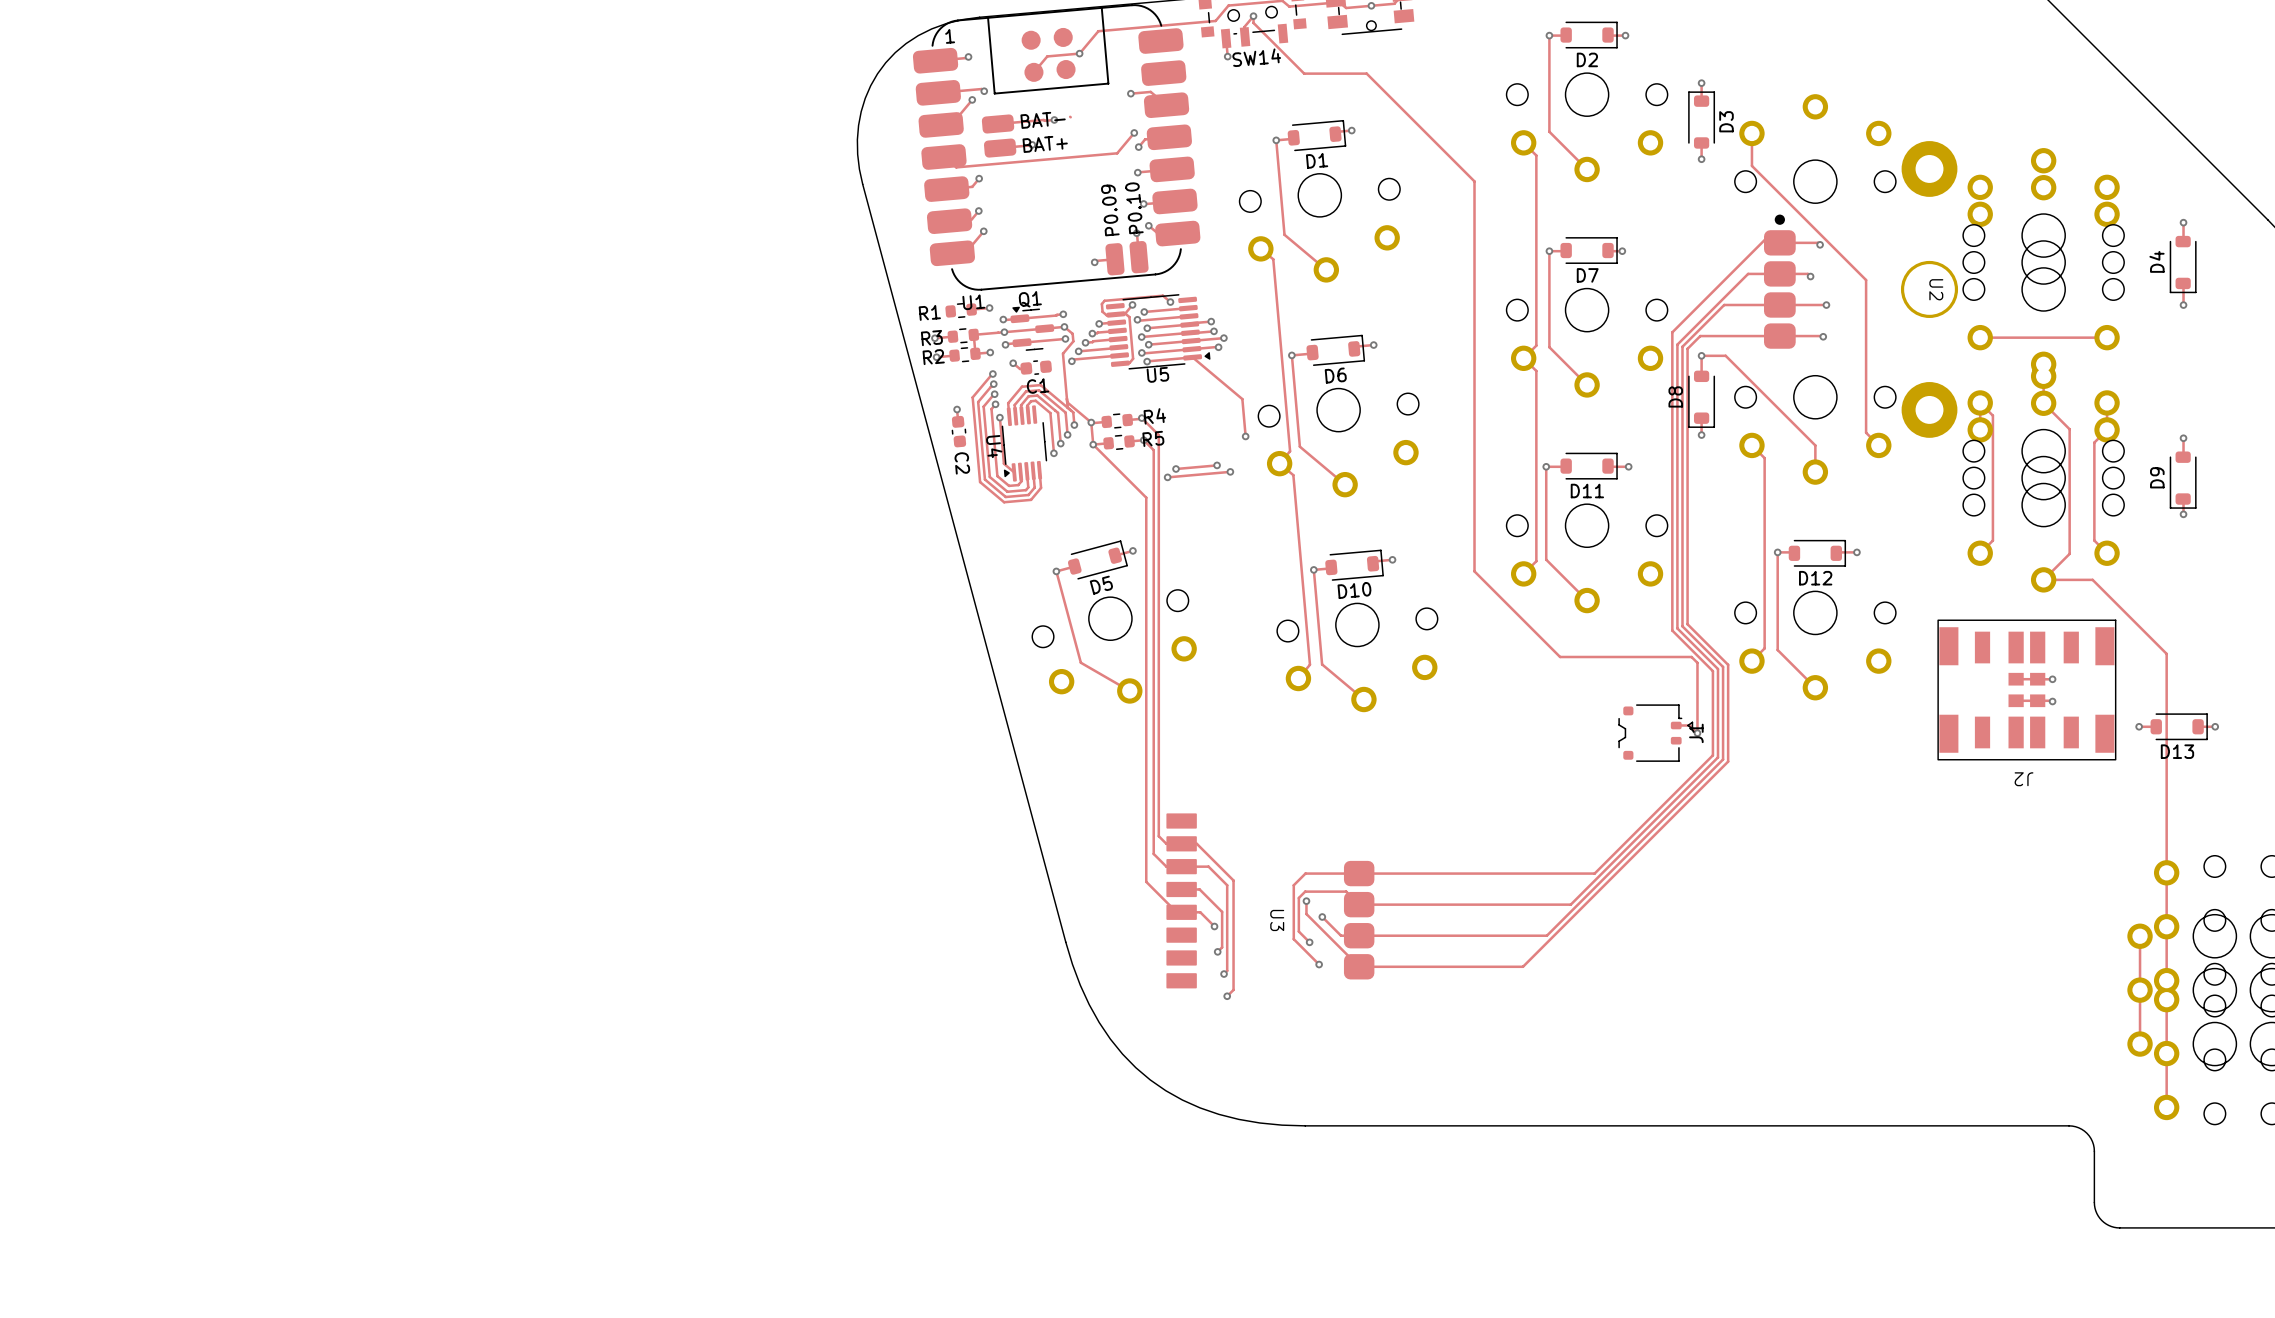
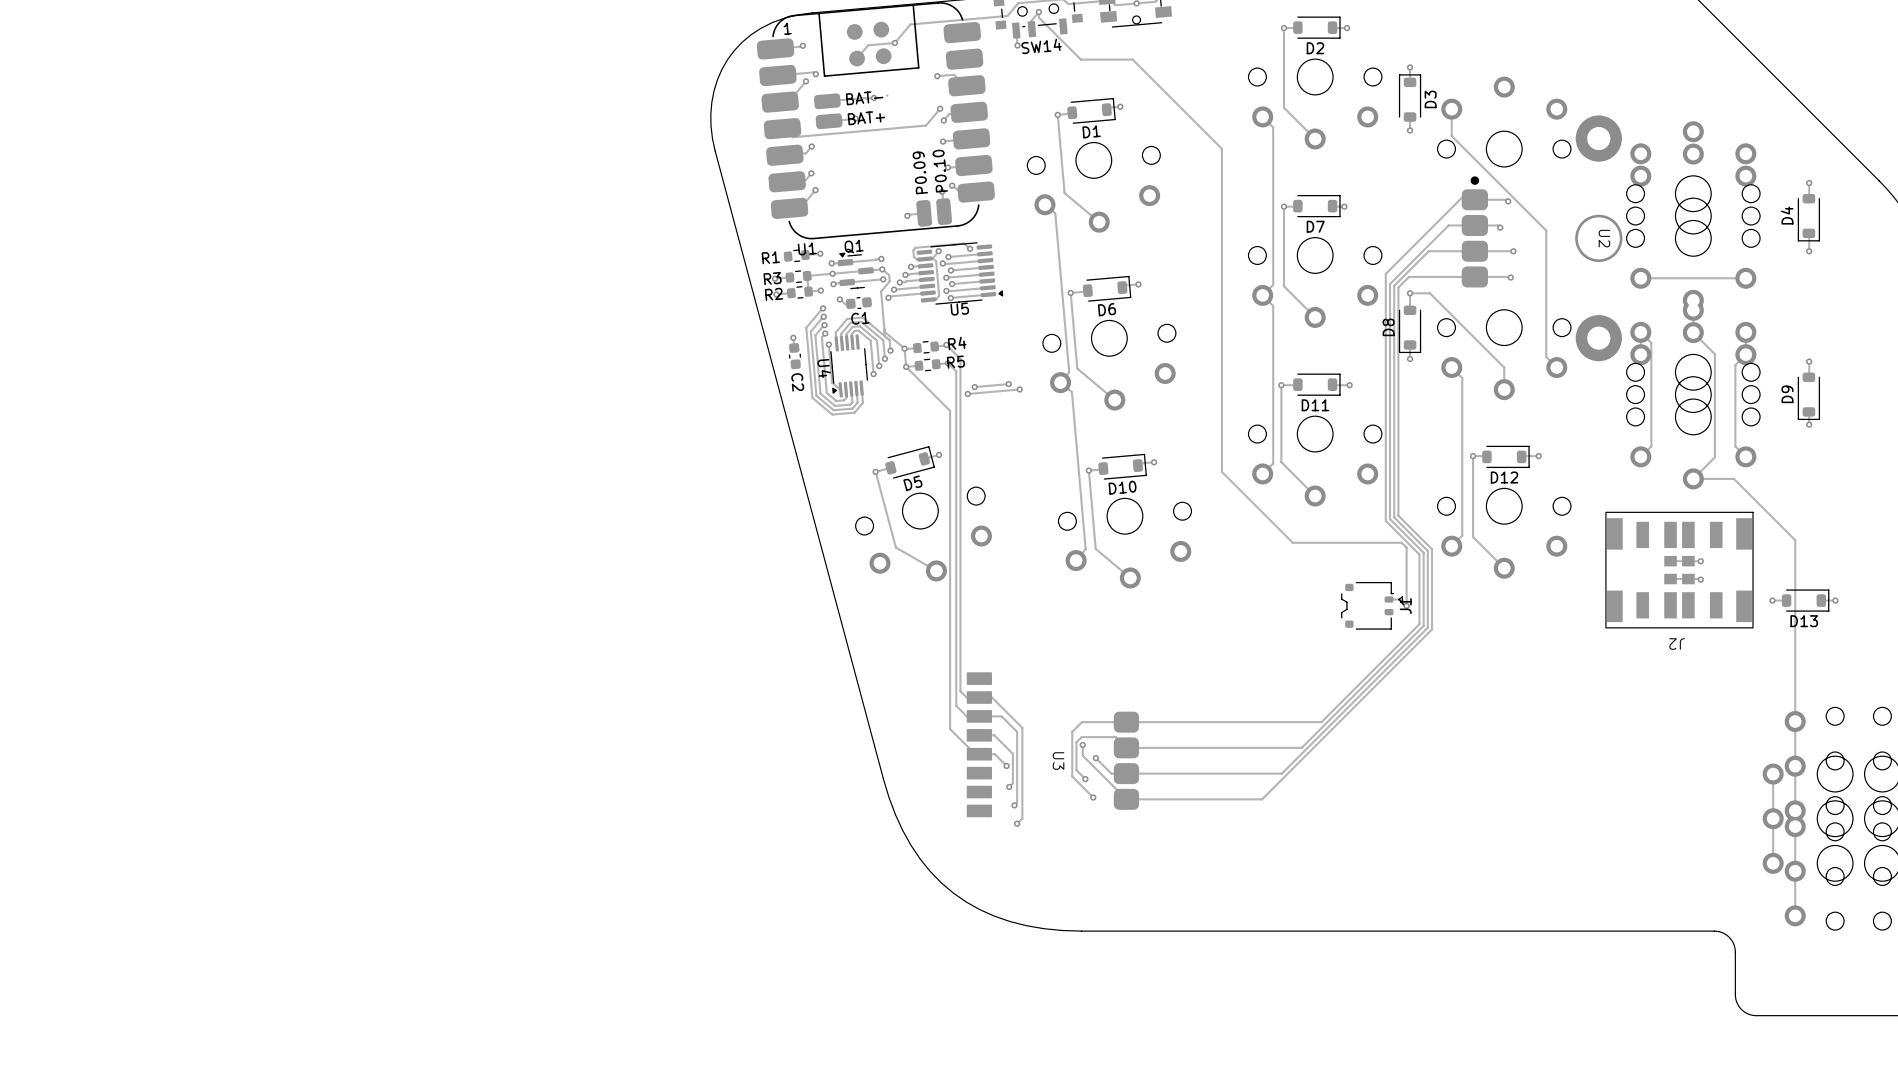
track: (1211, 321) (1189, 324) -> none
via: (1211, 321) -> none
track: (1214, 331) (1190, 332) -> none
via: (1214, 331) -> none
track: (1223, 338) (1191, 340) -> none
via: (1223, 338) -> none
track: (1218, 347) (1191, 349) -> none
via: (1218, 347) -> none
track: (1192, 357) (1242, 399) (1245, 436) -> none
via: (1245, 436) -> none

